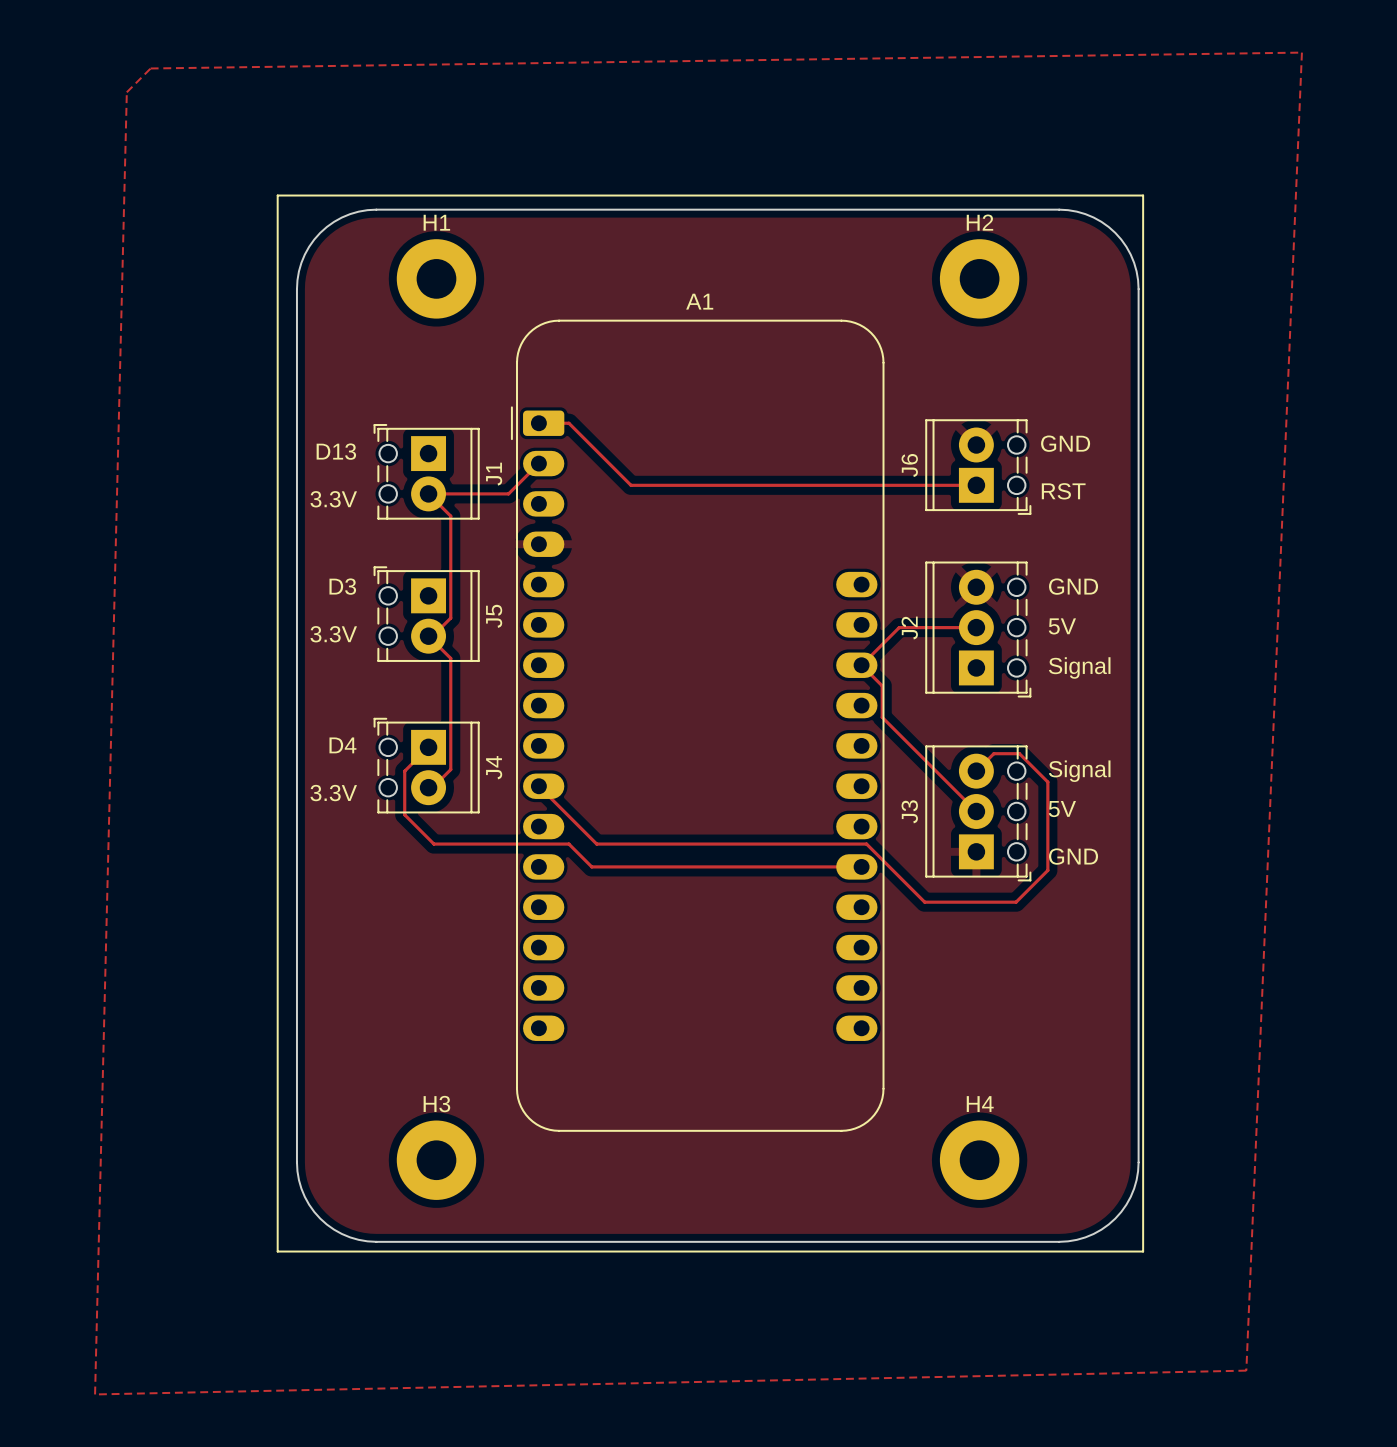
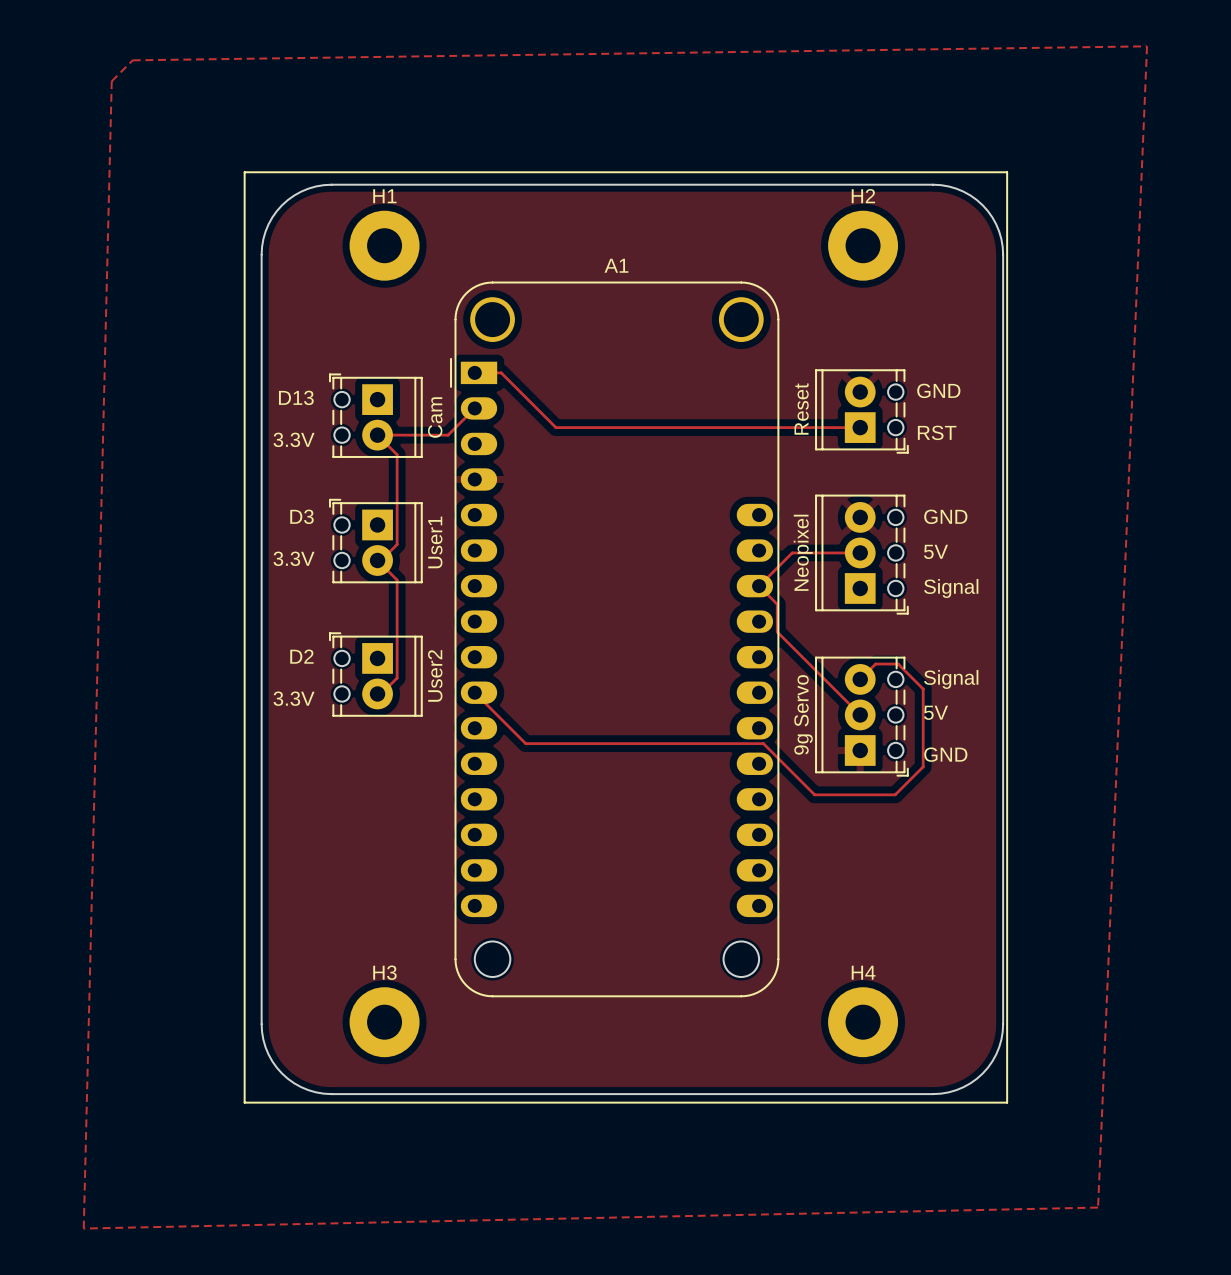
A1 footprint: [510, 319, 885, 1132] -> [450, 281, 780, 998]
J6 name: J6 (909, 465) -> Reset (801, 409)
J1 name: J1 (494, 474) -> Cam (435, 417)
J5 name: J5 (494, 616) -> User1 (435, 542)
J2 name: J2 (909, 628) -> Neopixel (803, 552)
text: D4 (342, 745) -> D2 (301, 656)
track: (428, 747) (404, 771) (404, 814) (433, 844) (568, 844) (591, 866) (861, 866) -> none
J4 name: J4 (494, 767) -> User2 (435, 675)
J3 name: J3 (909, 811) -> 9g Servo (803, 714)

